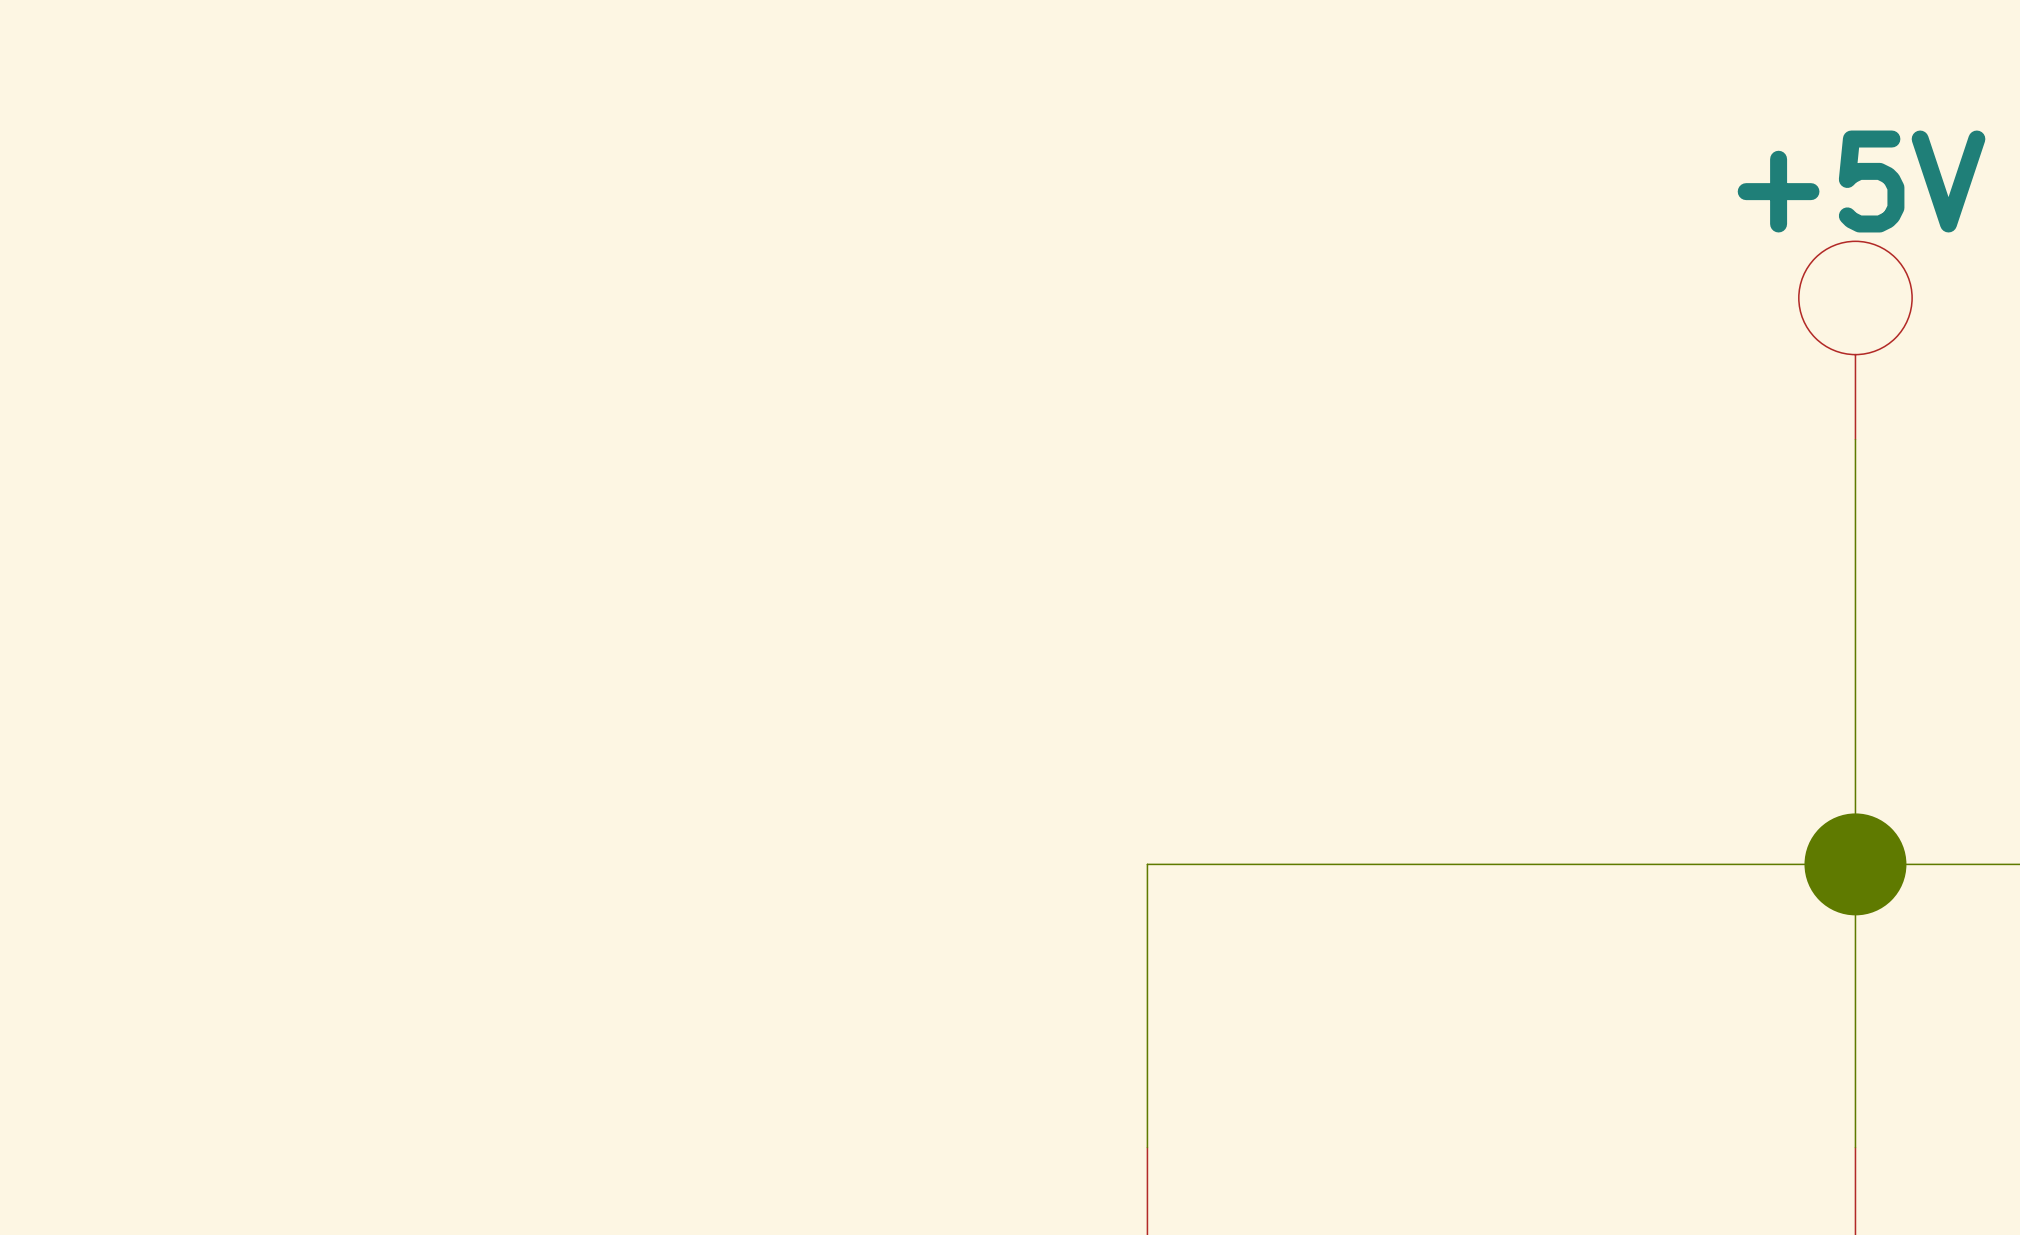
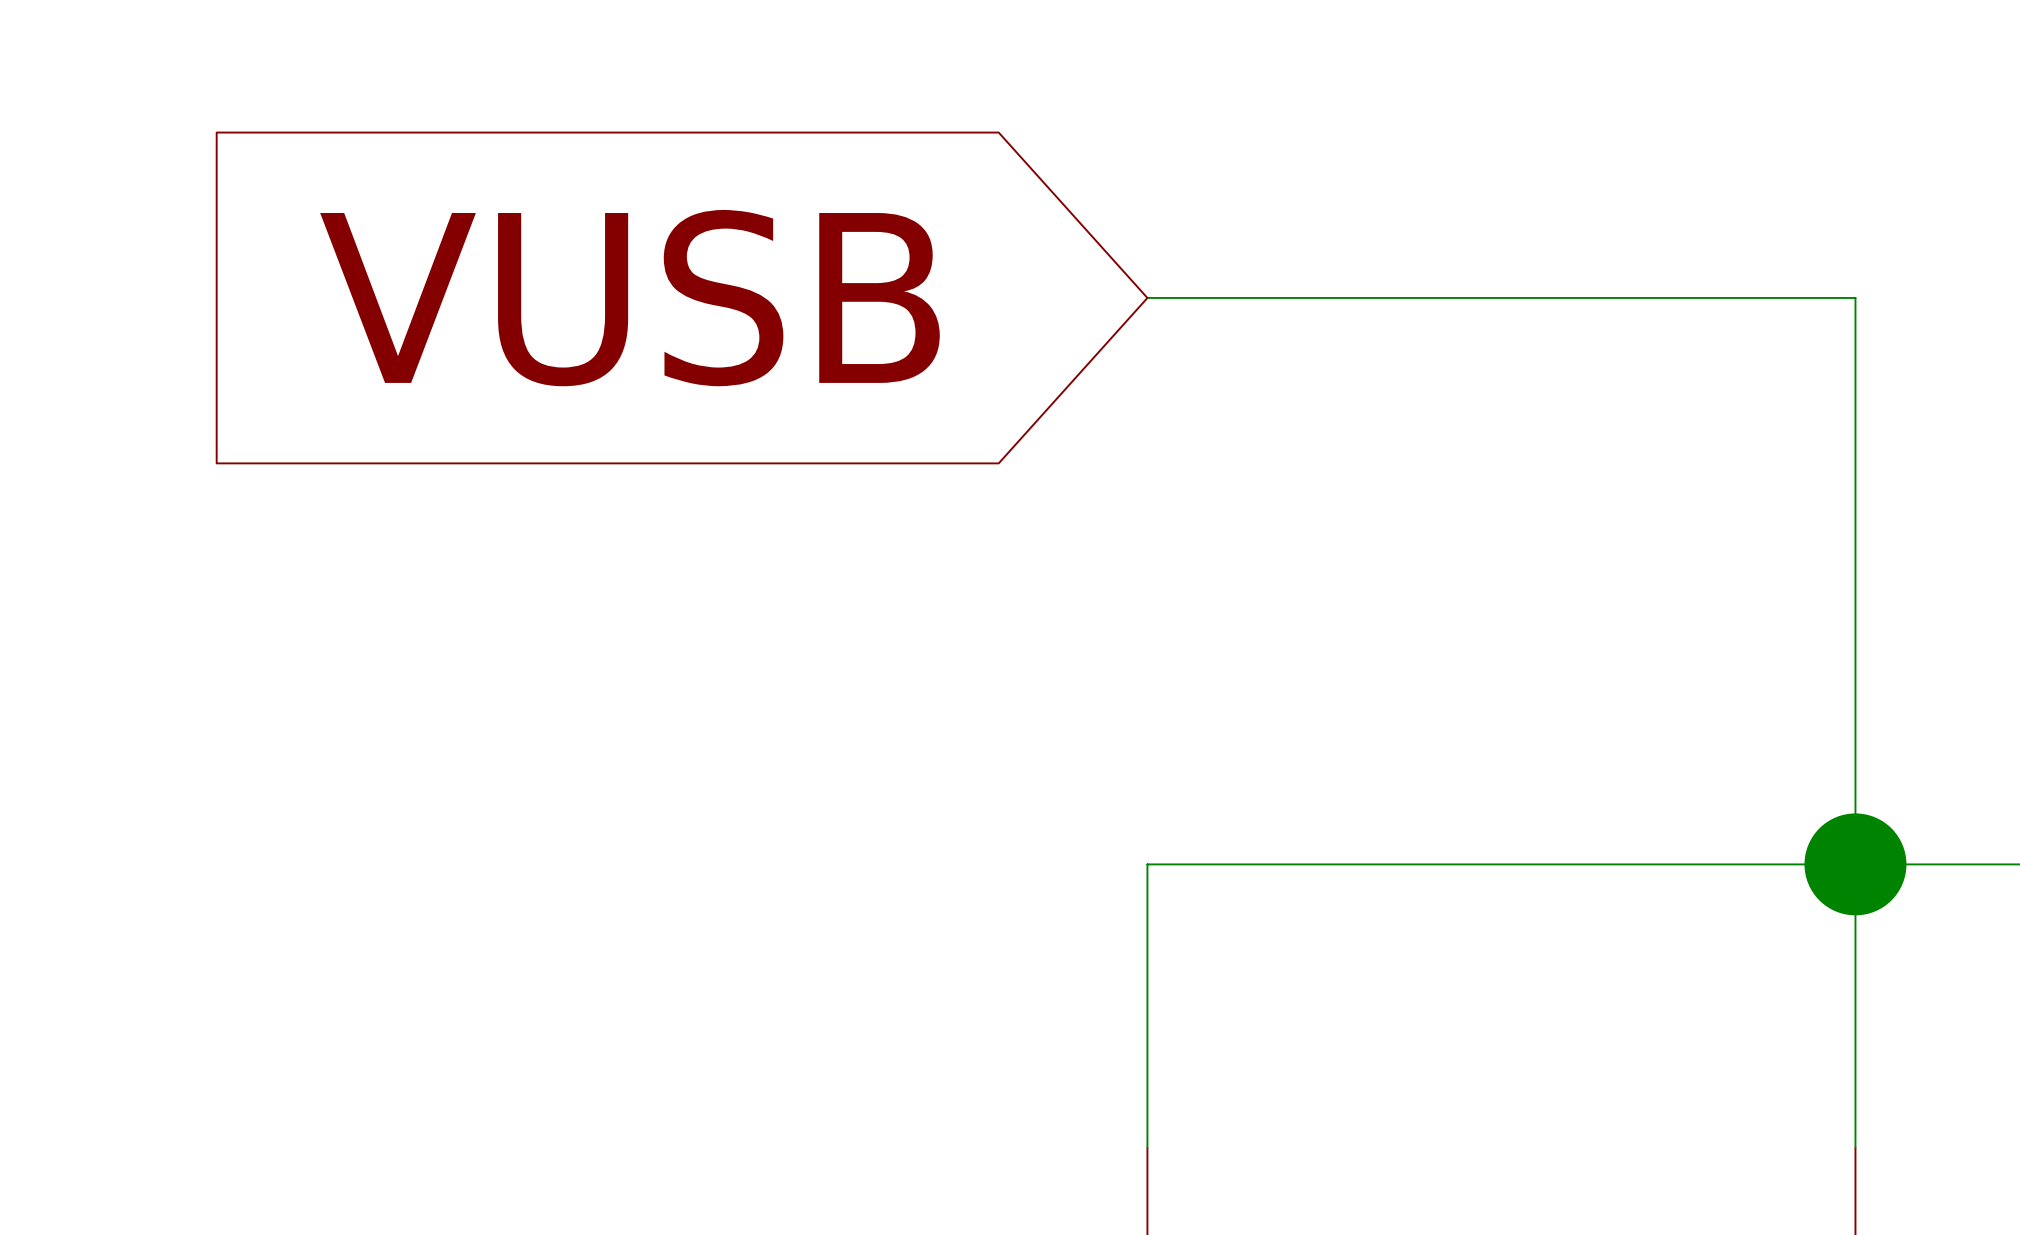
global label: none -> VUSB (629, 298)
wire: none -> (1147, 297) (1855, 297) (1855, 439)
power symbol: +5V (1855, 340) -> none

